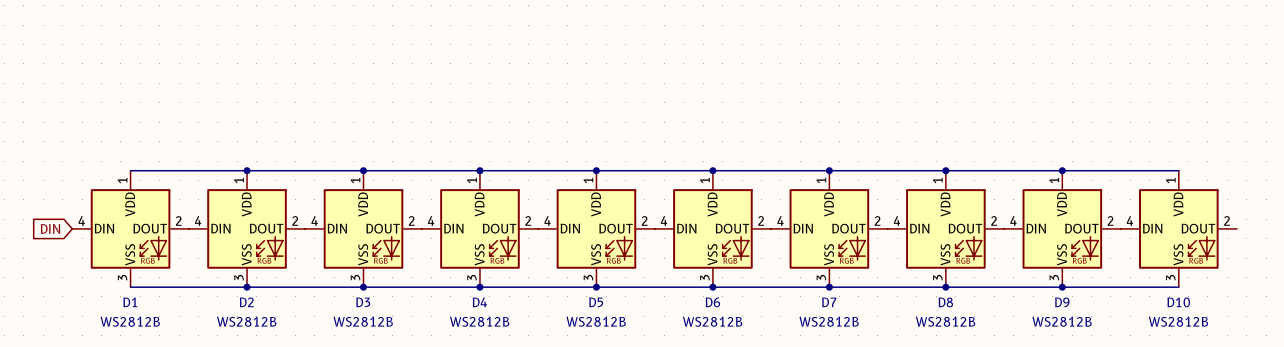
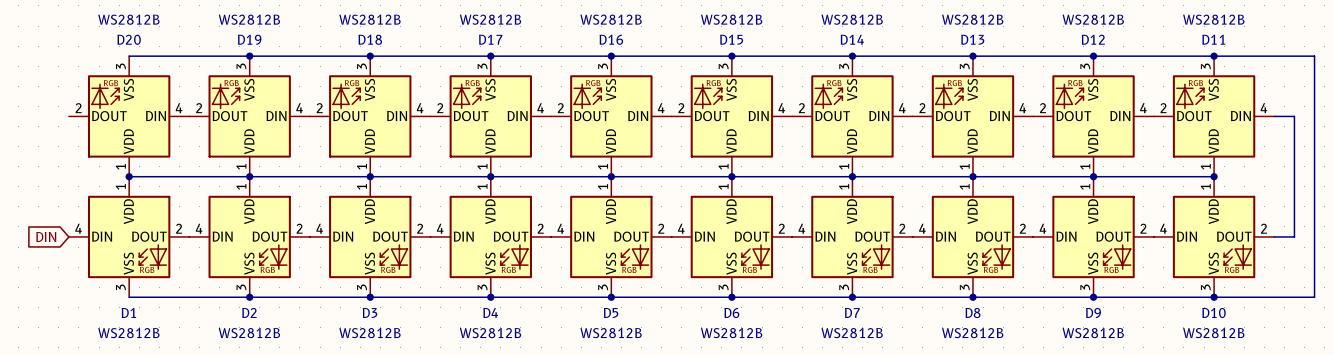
wire: none -> (129, 56) (1314, 56) (1314, 297) (1214, 297)
junction: none -> (249, 56)
junction: none -> (370, 56)
junction: none -> (490, 56)
junction: none -> (611, 56)
junction: none -> (731, 56)
junction: none -> (852, 56)
junction: none -> (972, 56)
junction: none -> (1093, 56)
junction: none -> (1214, 56)
D20: none -> WS2812B (129, 116)
D19: none -> WS2812B (249, 116)
D18: none -> WS2812B (370, 116)
D17: none -> WS2812B (490, 116)
D16: none -> WS2812B (611, 116)
D15: none -> WS2812B (731, 116)
D14: none -> WS2812B (852, 116)
D13: none -> WS2812B (972, 116)
D12: none -> WS2812B (1093, 116)
D11: none -> WS2812B (1214, 116)
wire: none -> (1274, 116) (1294, 116) (1294, 236) (1274, 236)
junction: none -> (129, 176)
junction: none -> (1214, 176)
junction: none -> (1214, 297)

